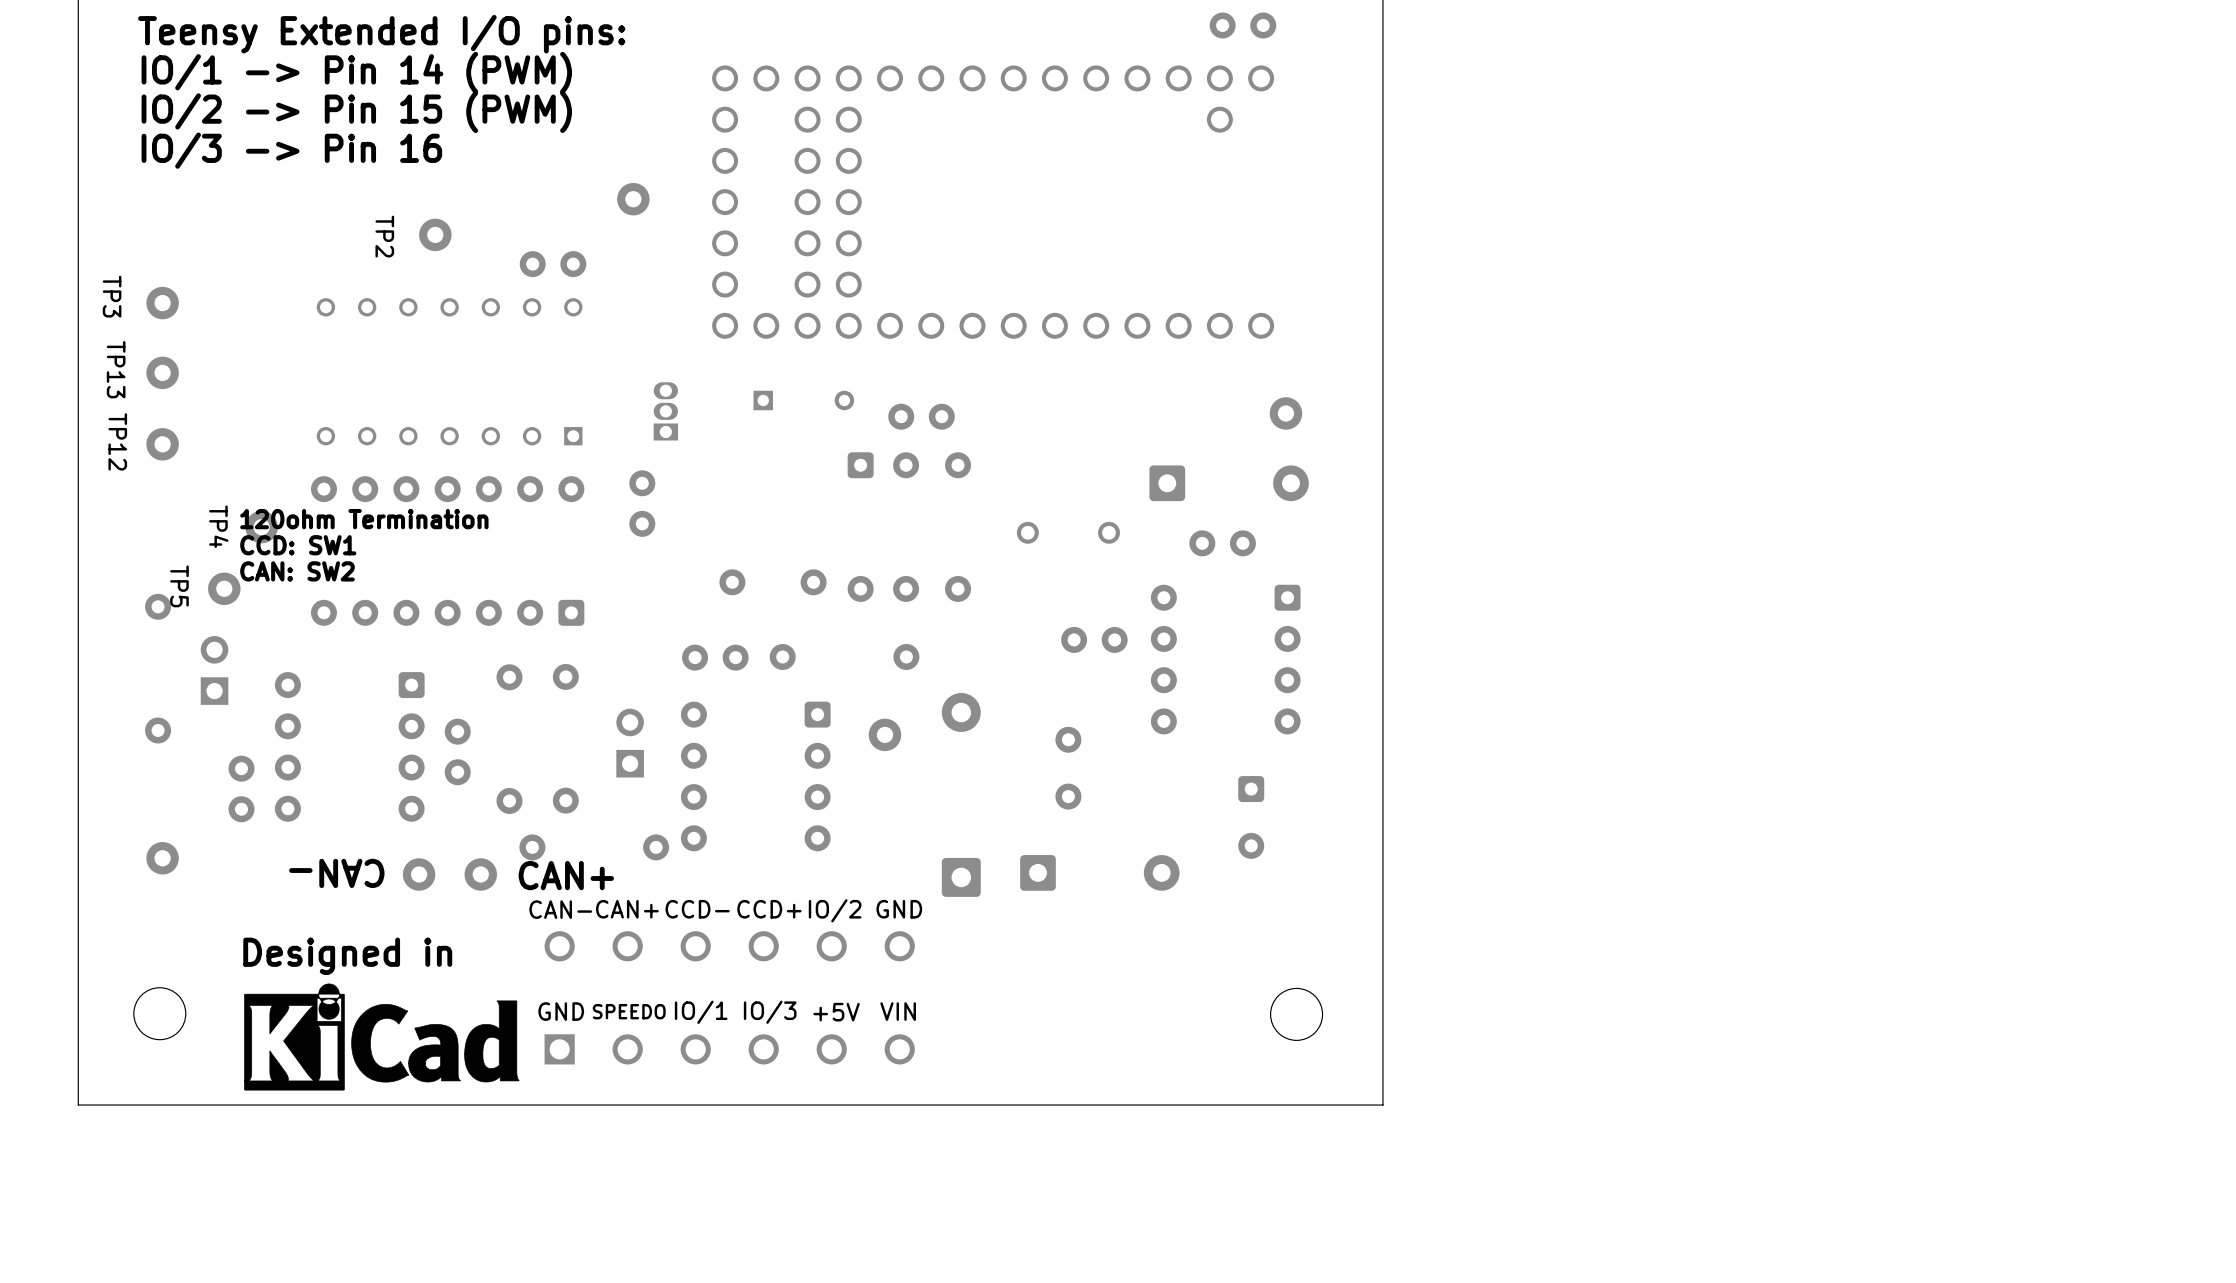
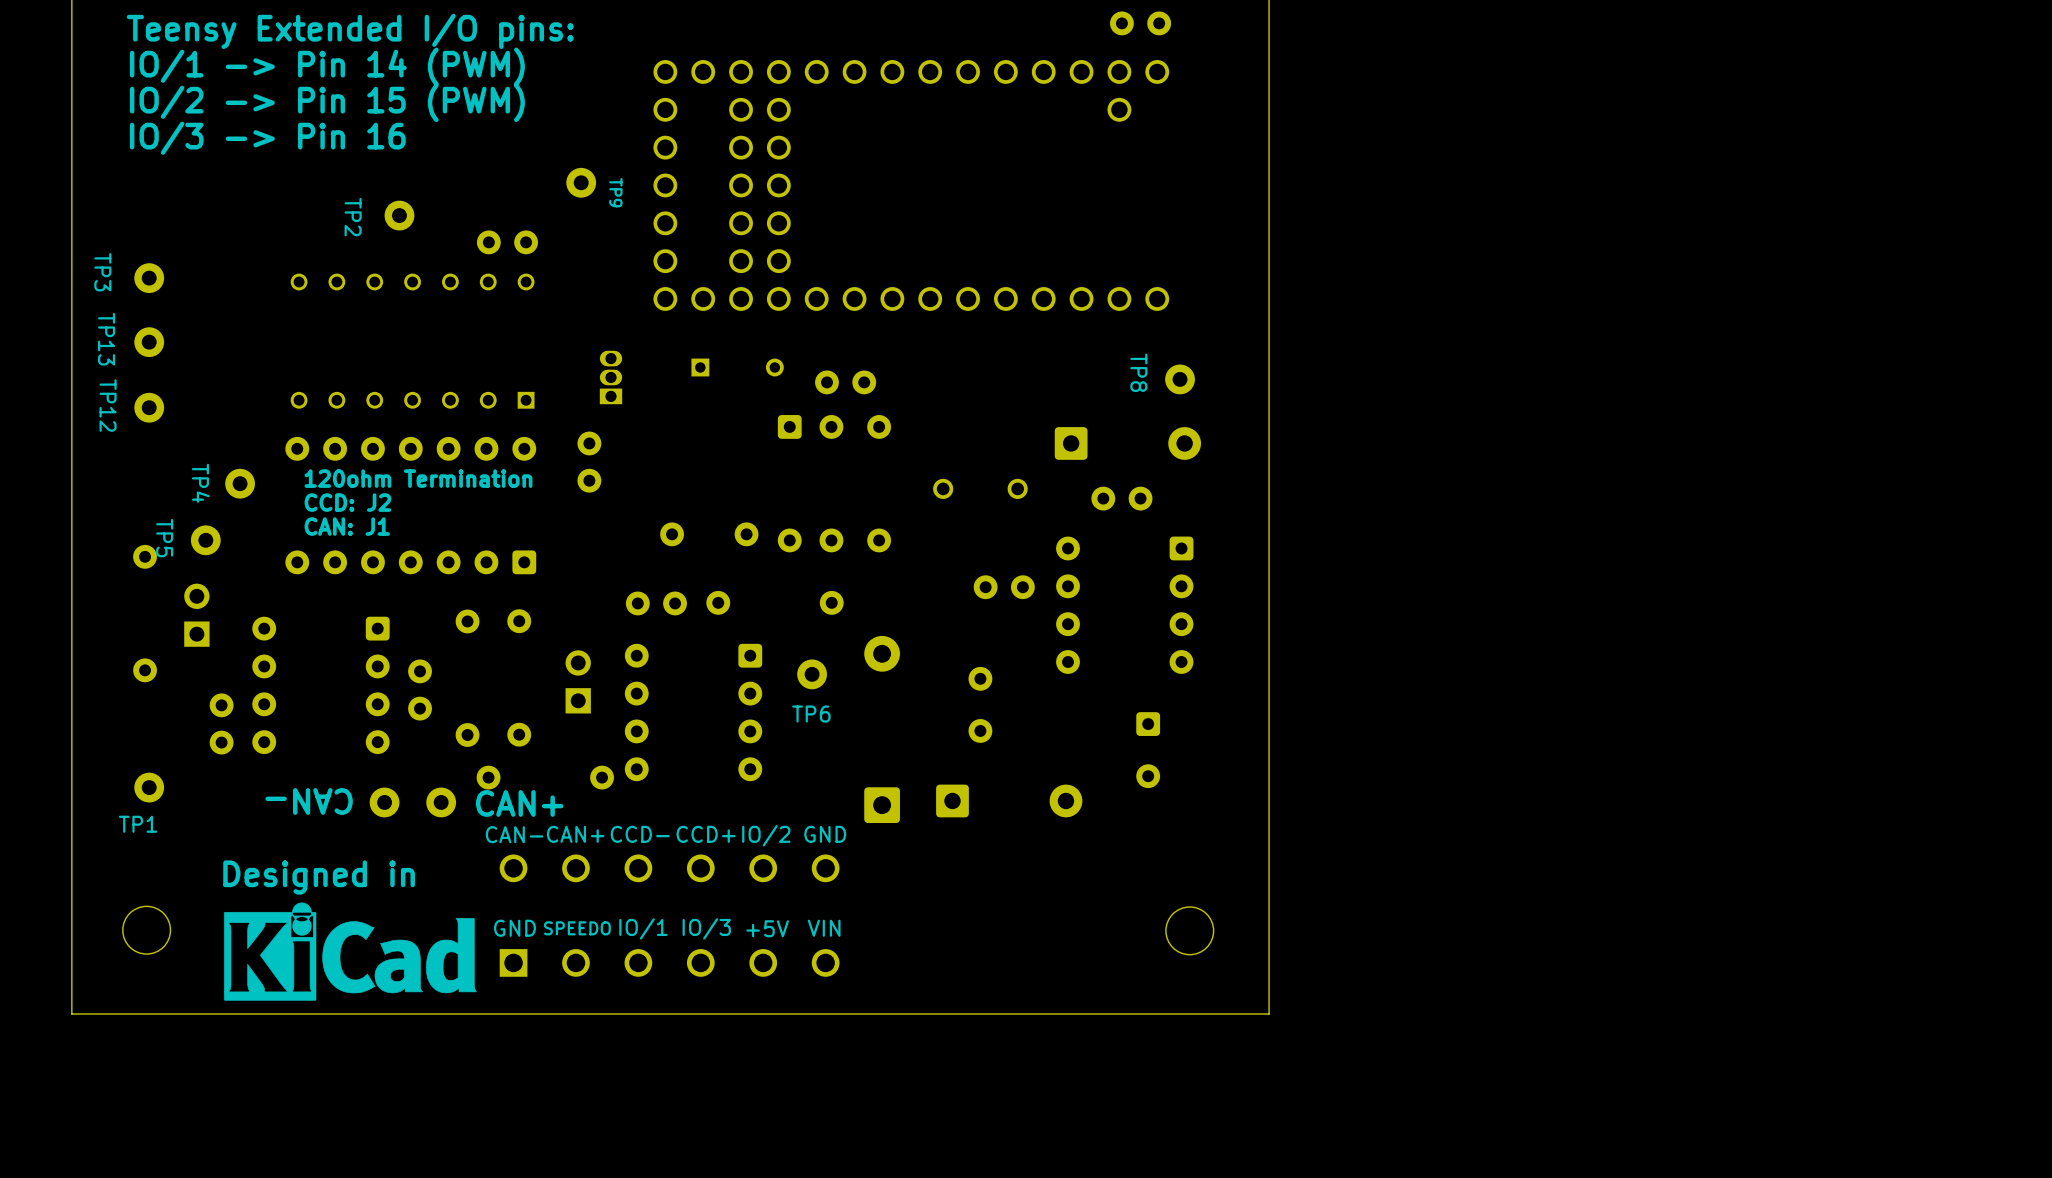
TP9 name: none -> TP9 (615, 192)
TP8 name: none -> TP8 (1138, 372)
text position: 120ohm Termination (364, 519) -> 120ohm Termination (418, 478)
text: CCD: SW1 (298, 545) -> CCD: J2 (347, 502)
text: CAN: SW2 (297, 571) -> CAN: J1 (347, 526)
TP6 name: none -> TP6 (811, 714)
TP1 name: none -> TP1 (138, 824)

